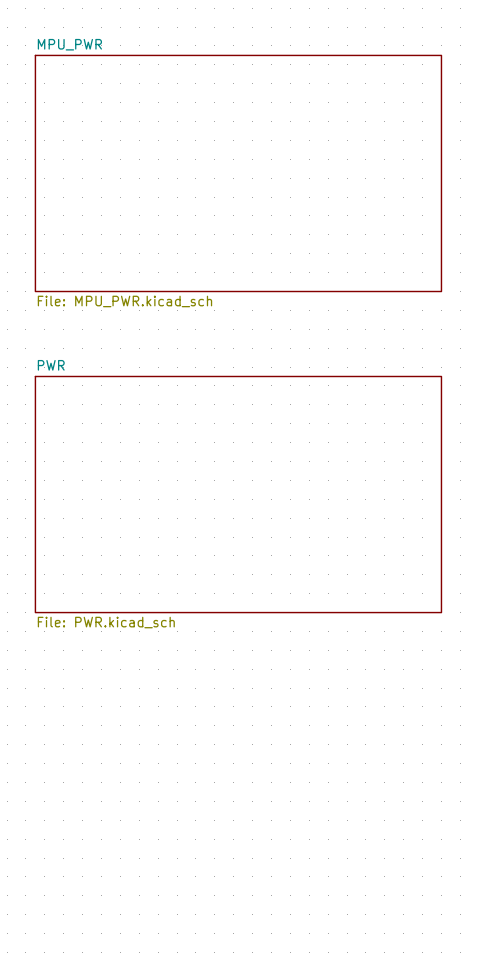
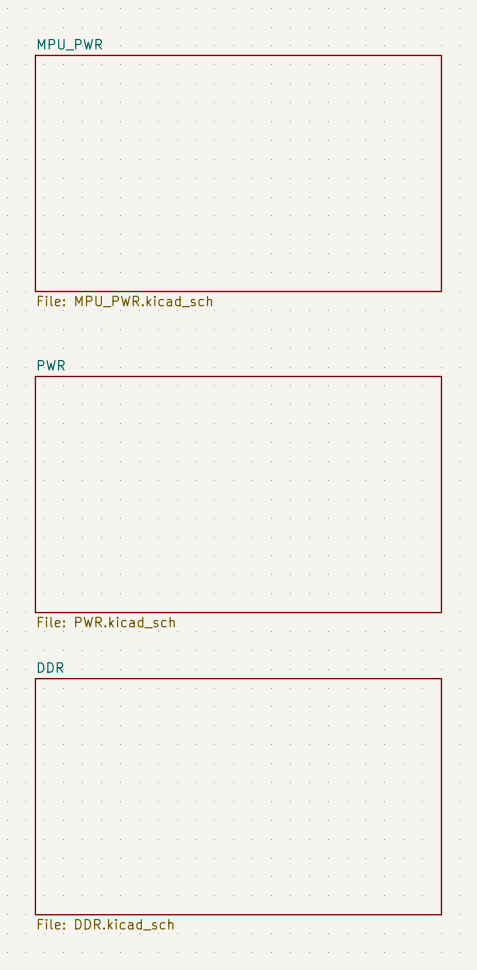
sheet DDR: none -> File: DDR.kicad_sch (238, 796)

